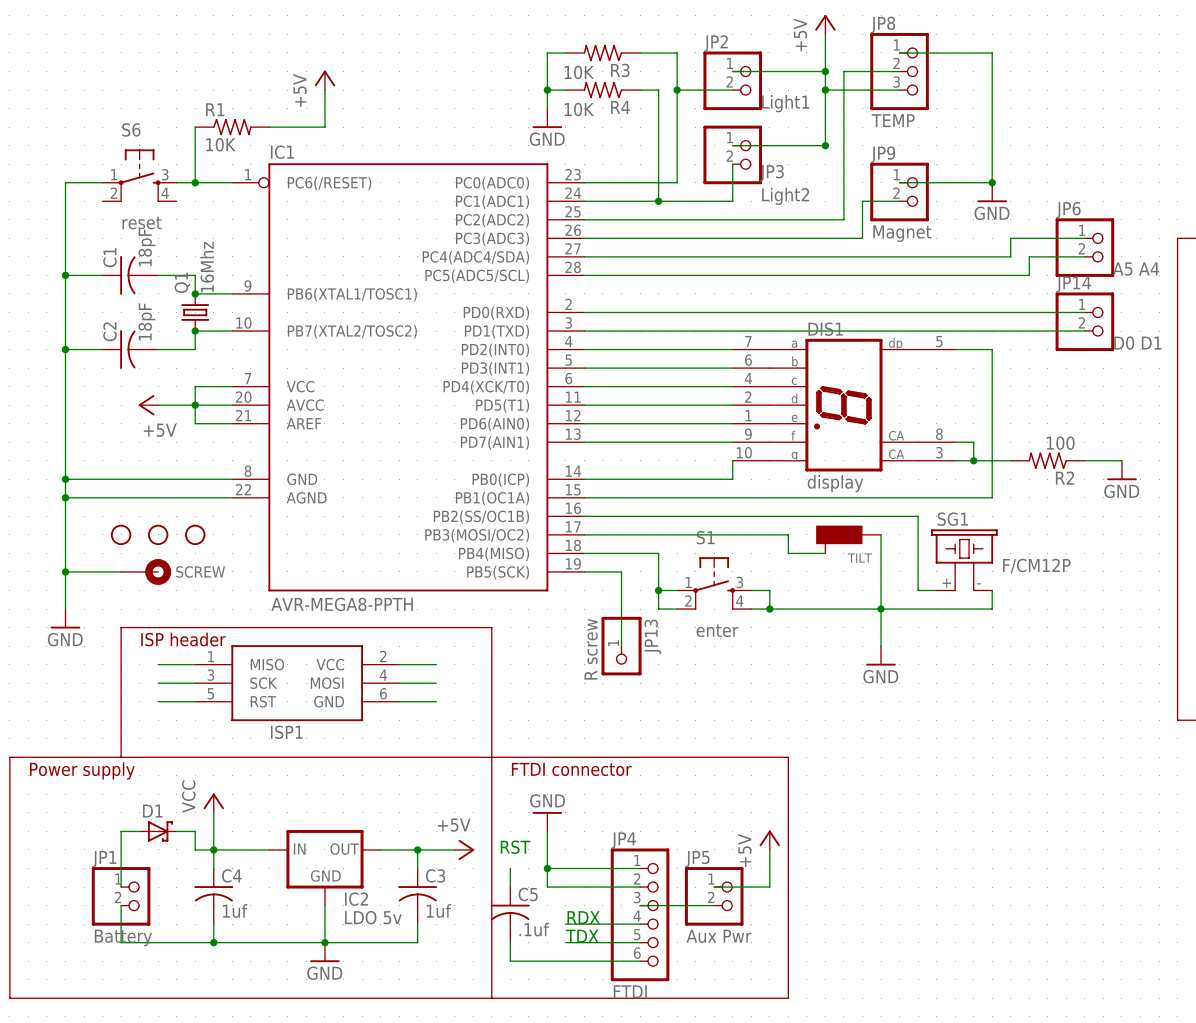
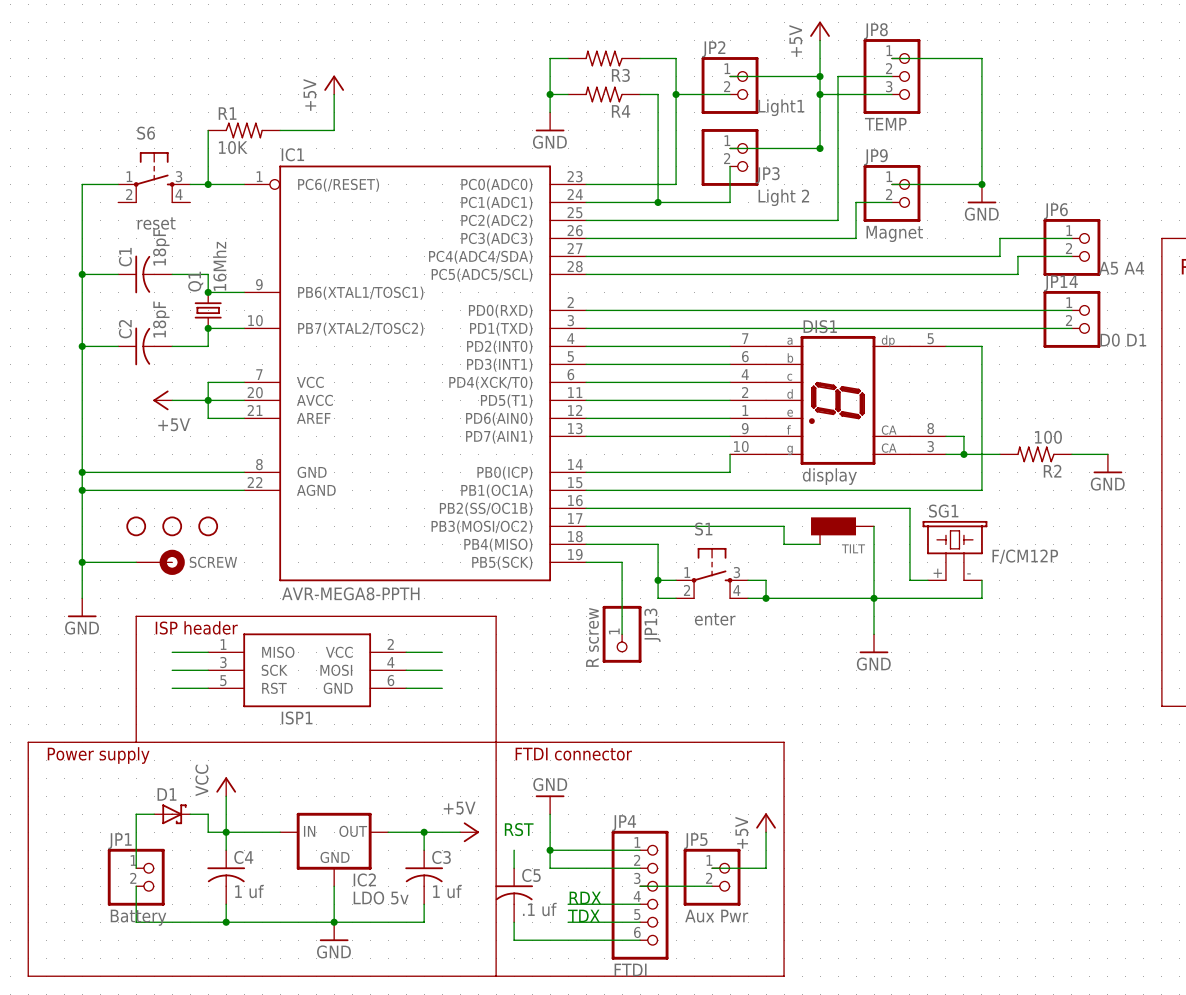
R3 value: 10K (579, 72) -> none
R4 value: 10K (579, 109) -> none
JP3 value: Light2 (785, 196) -> Light 2 (783, 197)
C4 value: 1uf (235, 911) -> 1 uf (249, 891)
C3 value: 1uf (439, 911) -> 1 uf (447, 891)
C5 value: .1uf (534, 929) -> .1 uf (539, 909)

